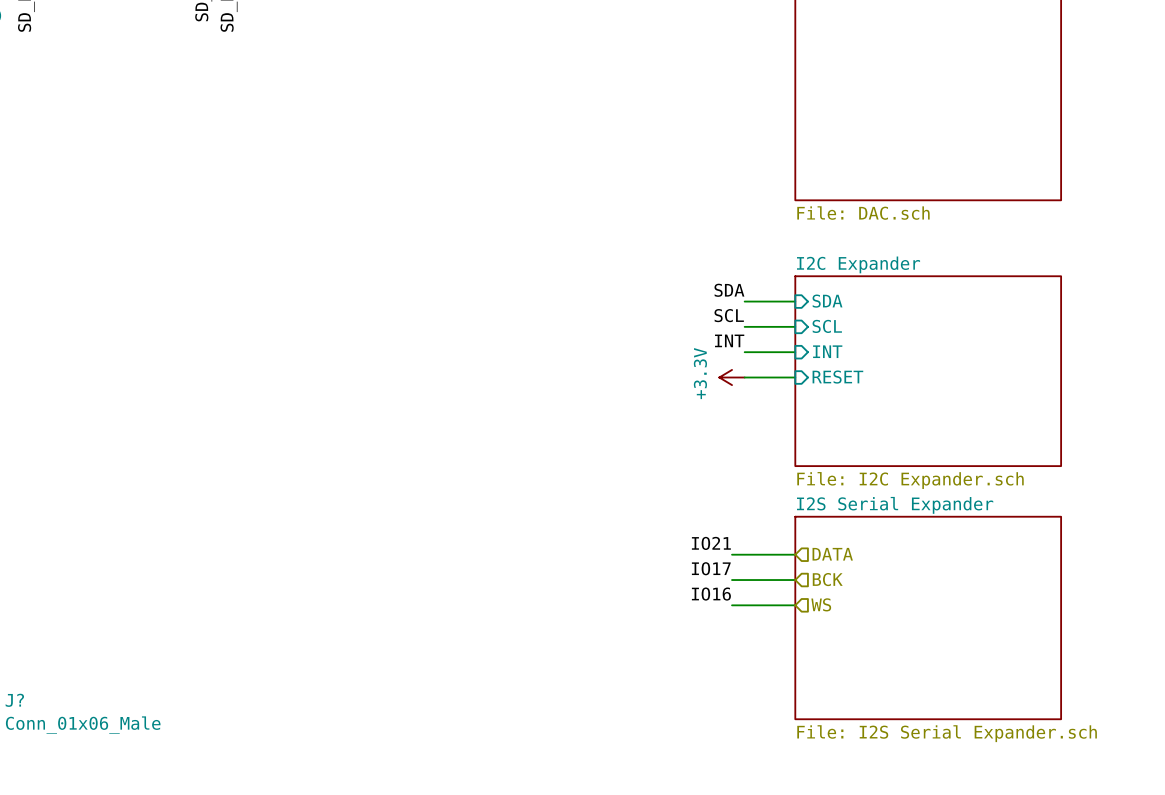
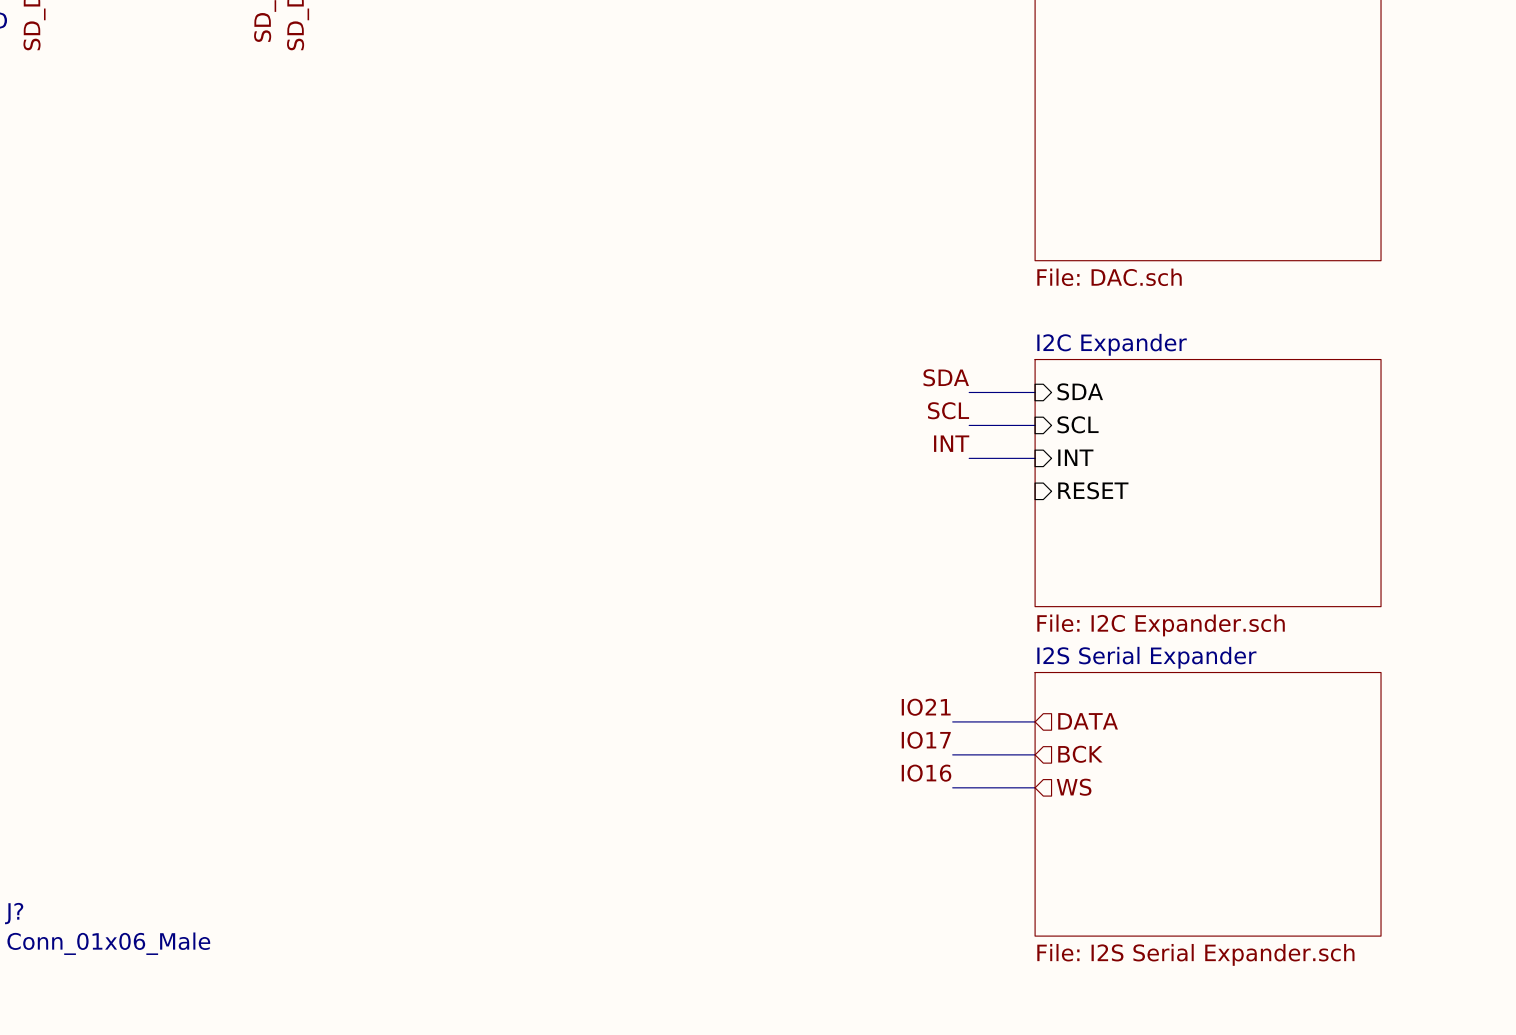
power symbol: +3.3V (732, 377) -> none
wire: (744, 377) (795, 377) -> none

